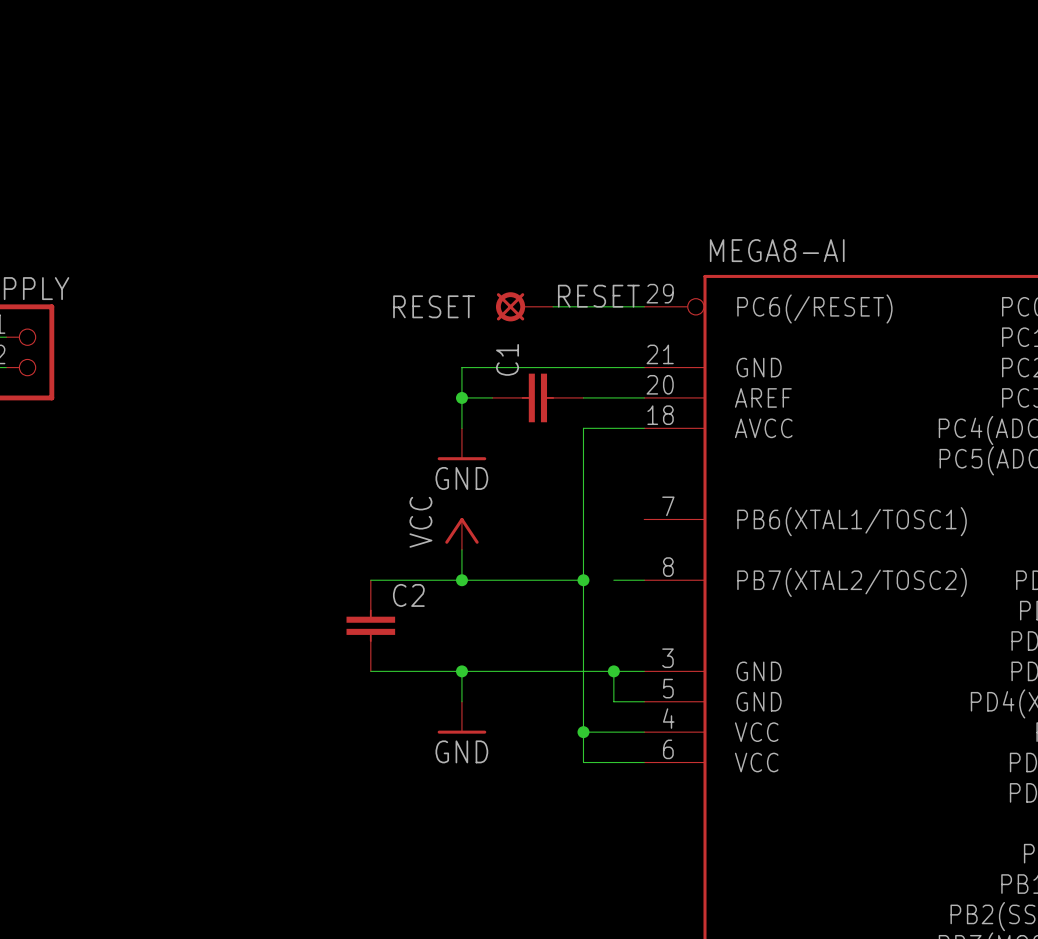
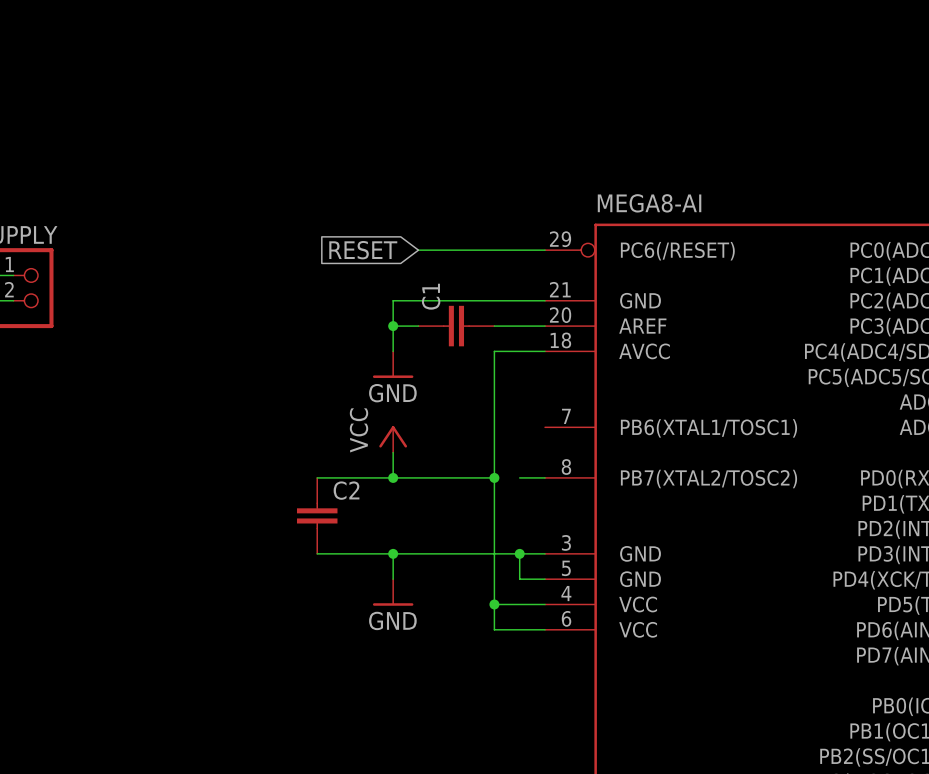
label: RESET (598, 296) -> none
global label: none -> RESET (363, 250)
RESET: (524, 306) -> none

